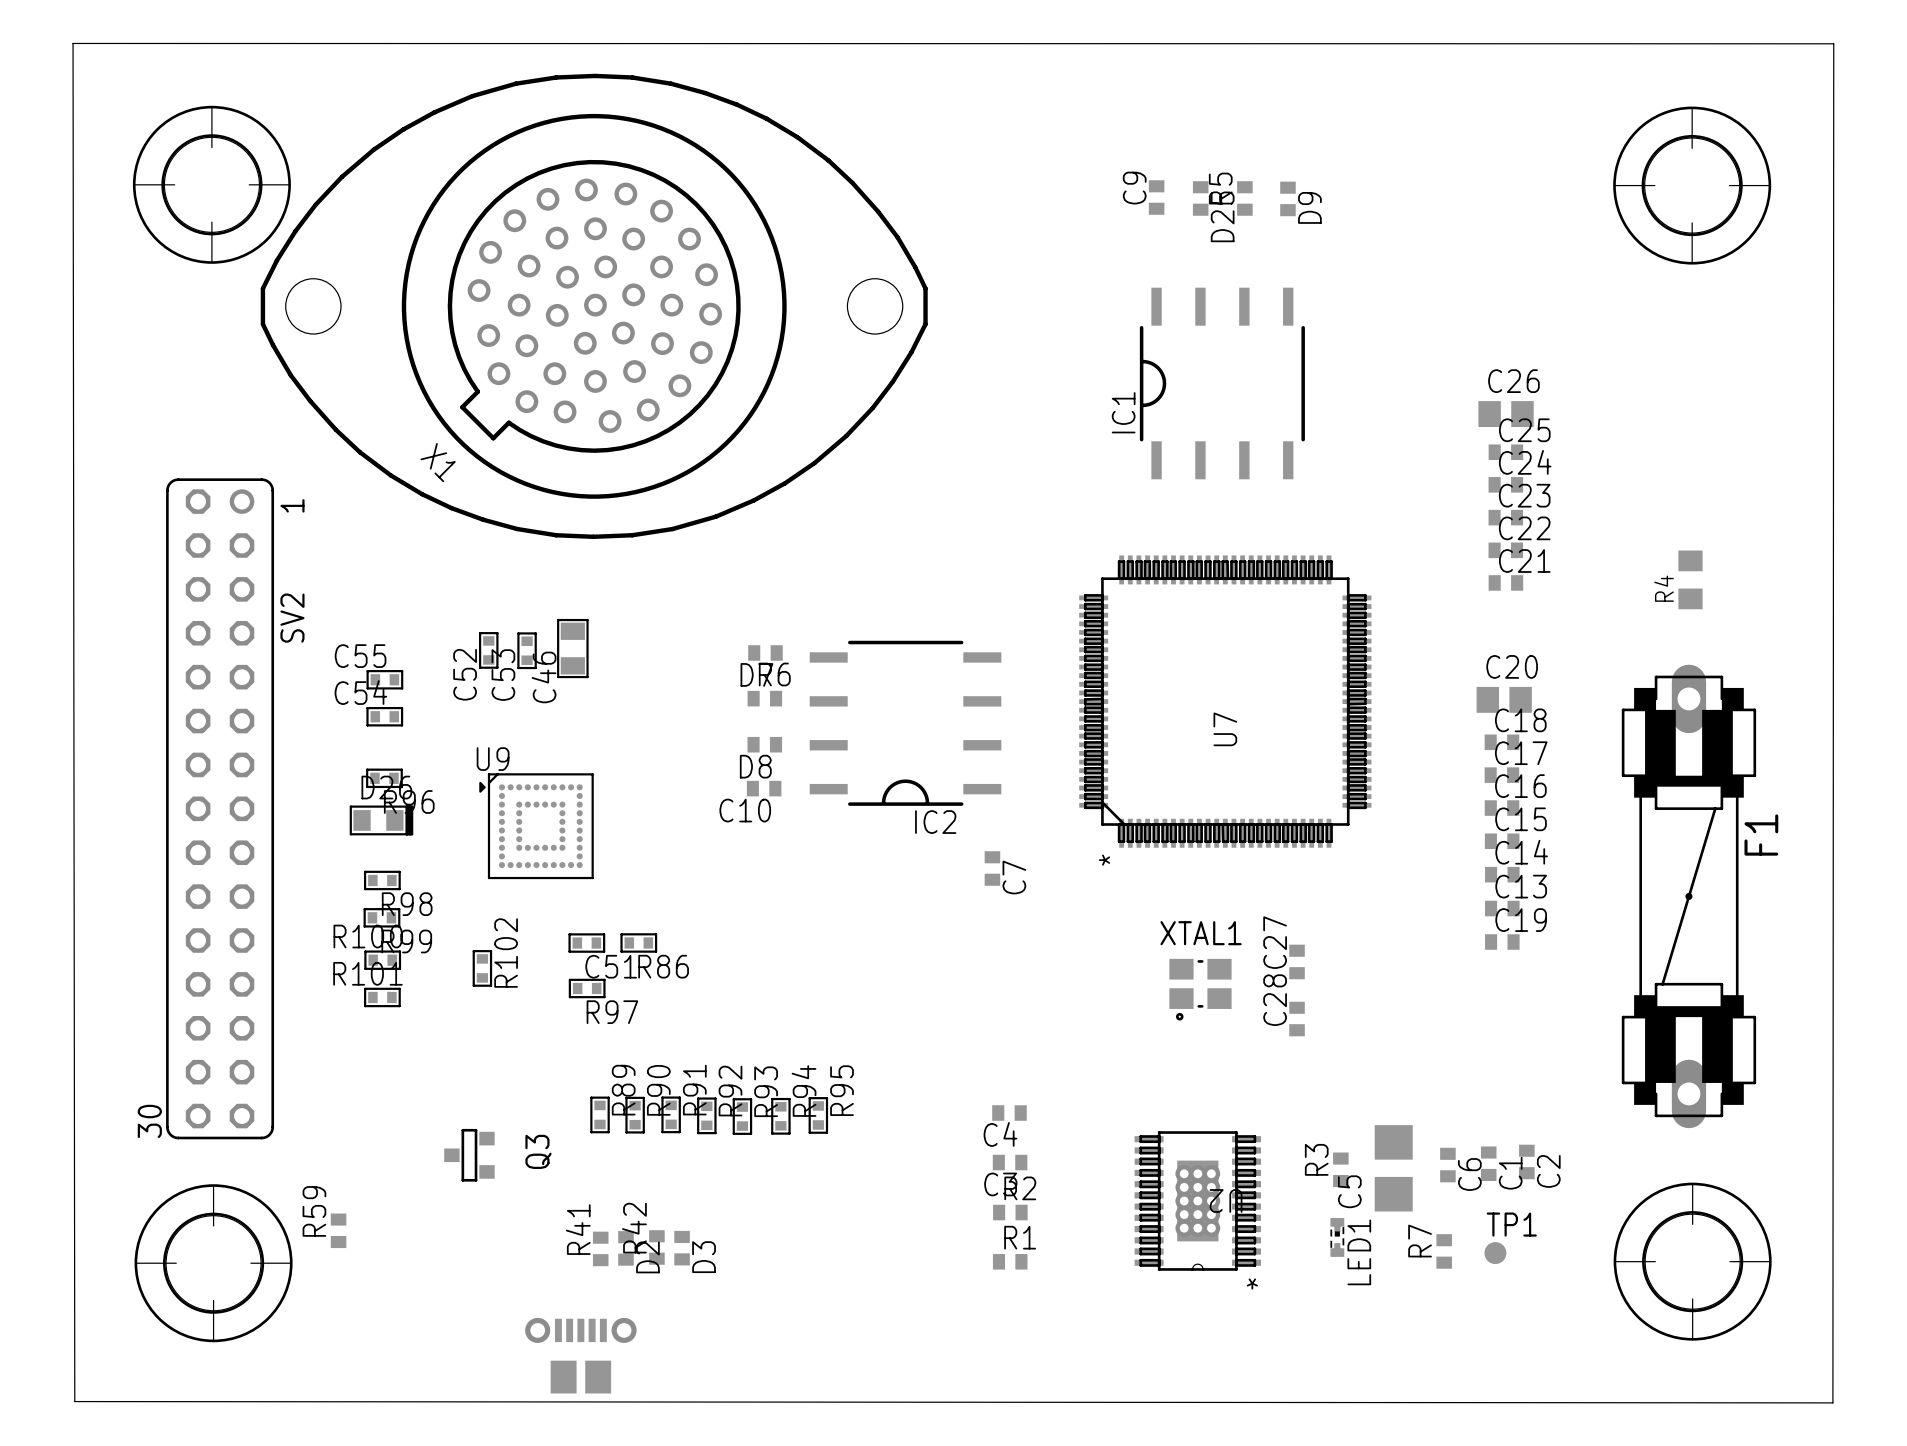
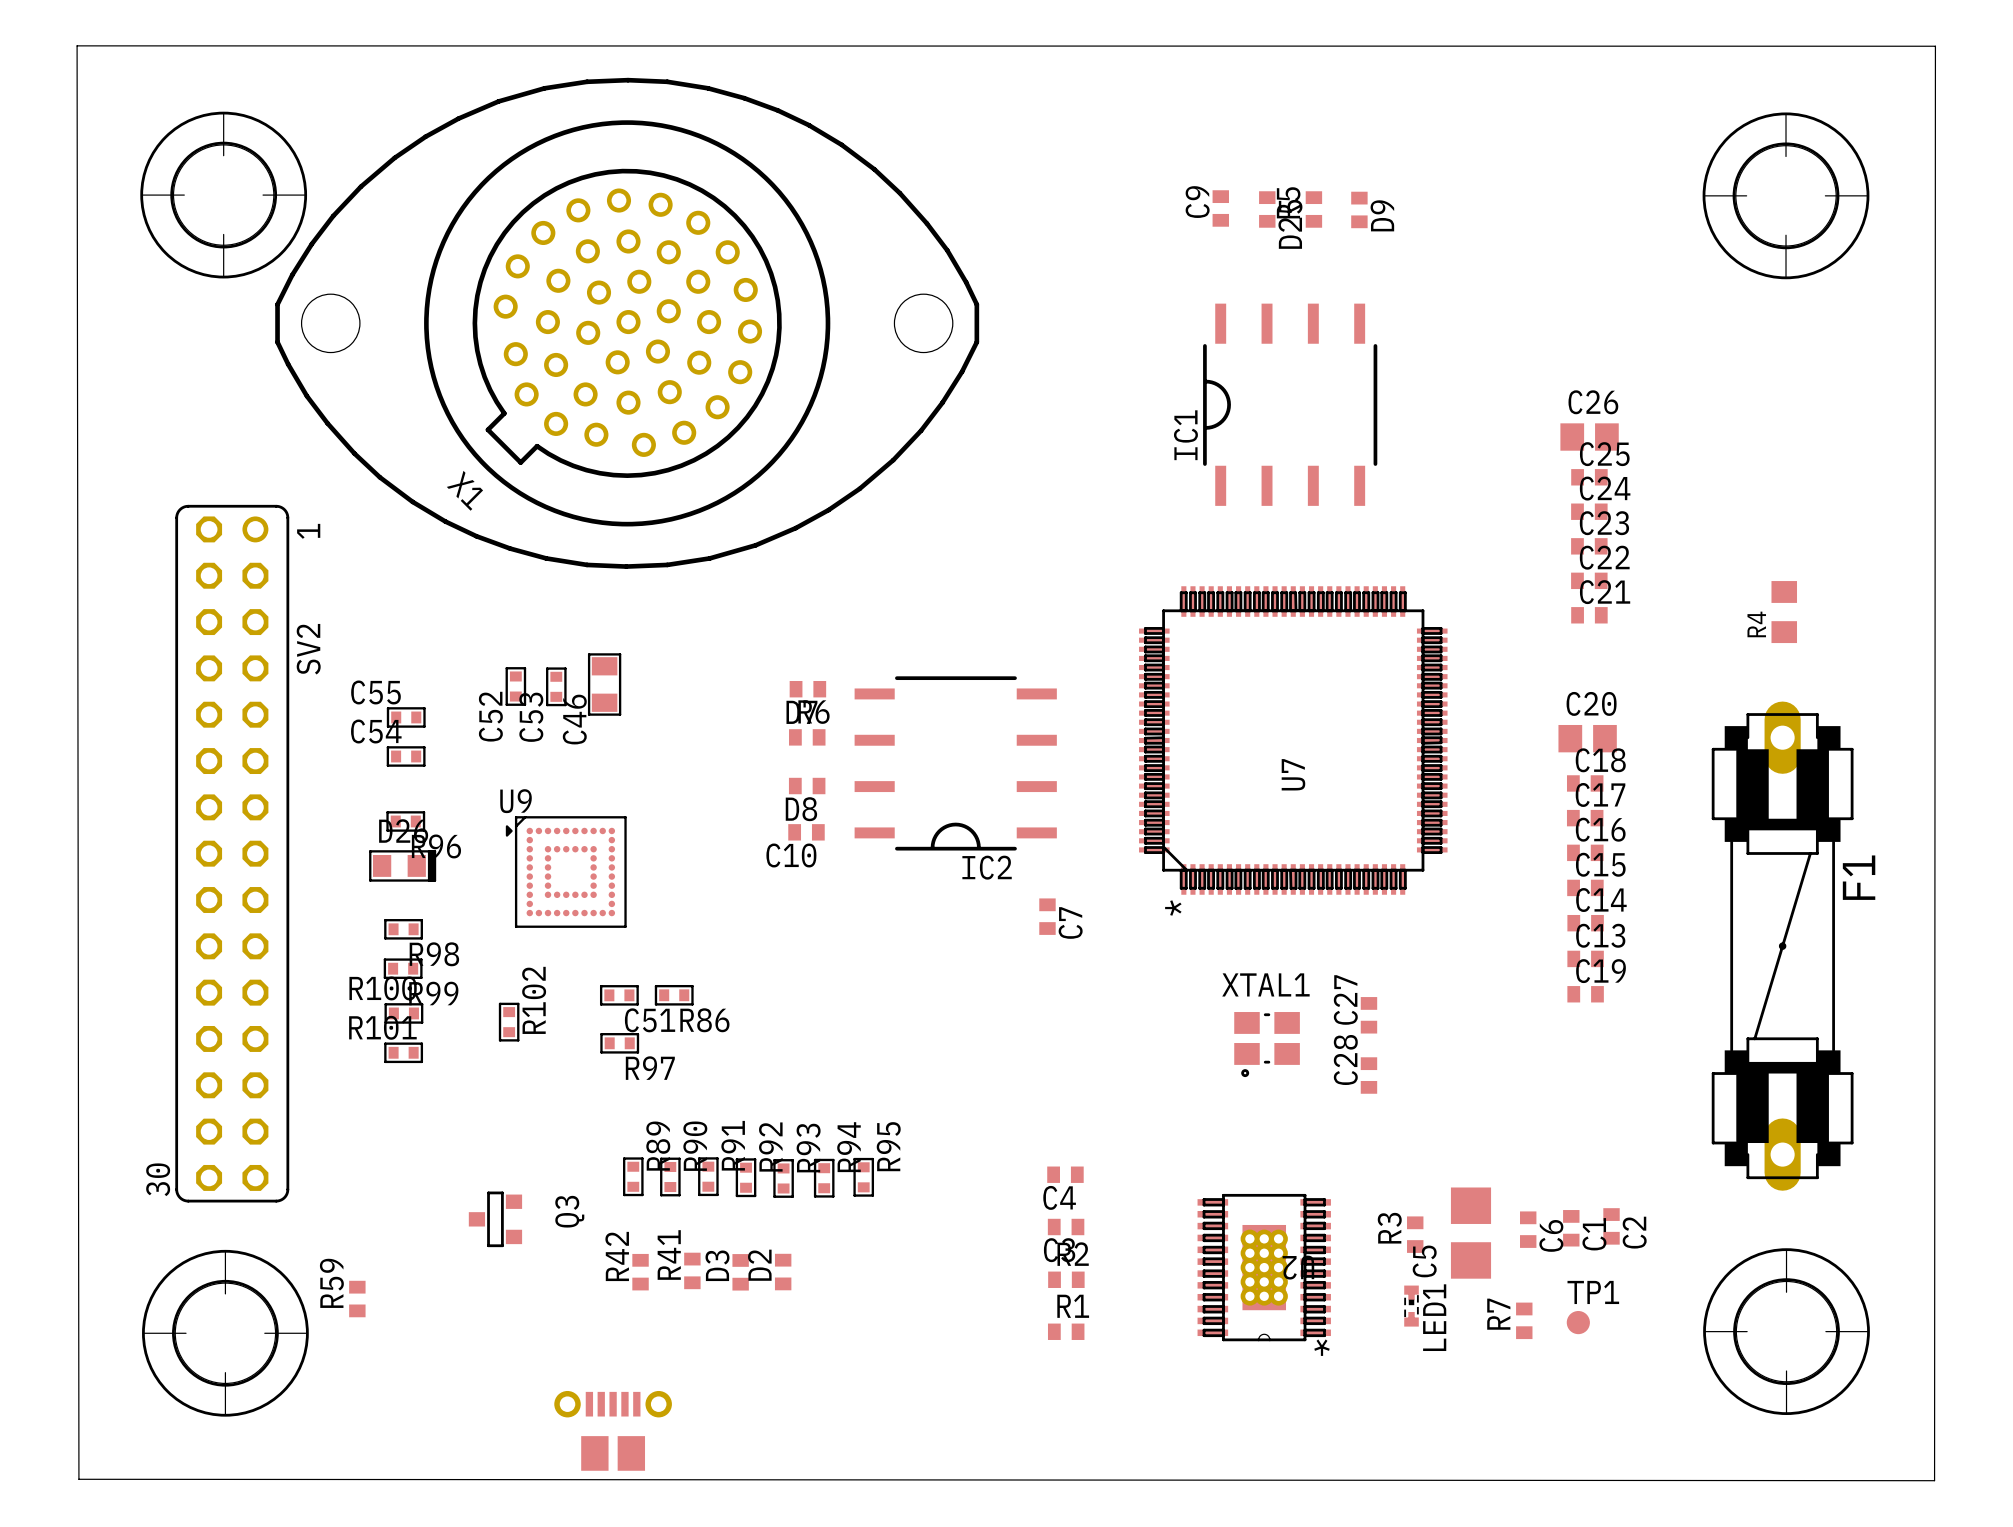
R42 position: (656, 1247) -> (640, 1272)
R41 position: (600, 1248) -> (692, 1270)
D2 position: (625, 1248) -> (783, 1272)
D3 position: (682, 1248) -> (740, 1272)
D2 name position: D2 (647, 1257) -> D2 (759, 1265)
D3 name position: D3 (704, 1257) -> D3 (717, 1265)

